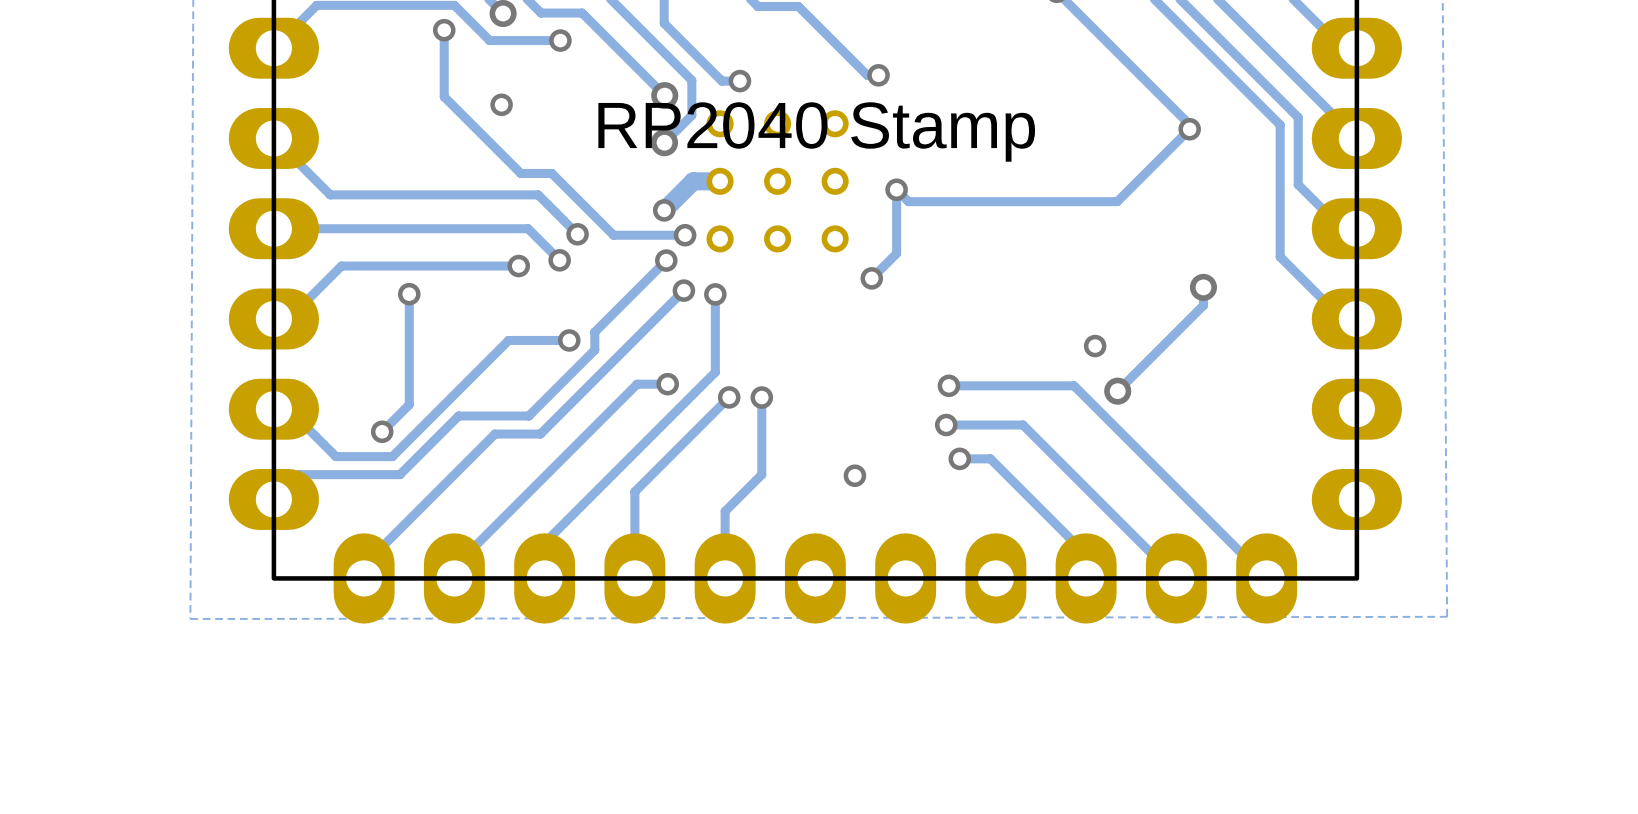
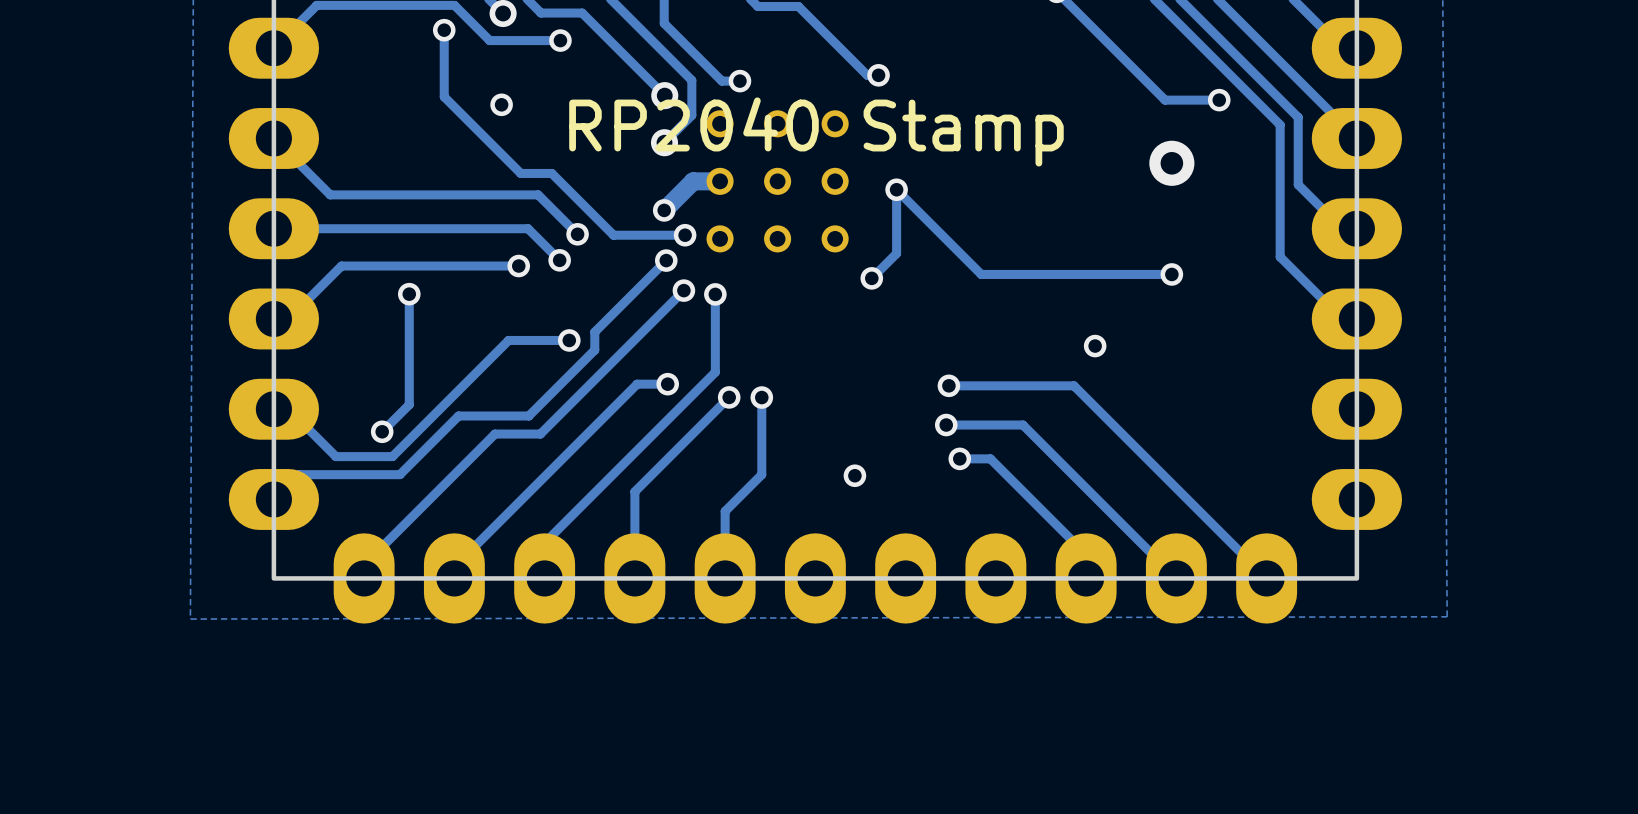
track: (1165, 100) (1189, 124) (1189, 129) (1117, 201) (908, 201) -> (1171, 274) (981, 274) (908, 201)
track: none -> (1219, 100) (1165, 100)
via position: (1189, 129) -> (1219, 100)
via: none -> (1171, 163)
via: none -> (1171, 274)
track: (1203, 287) (1203, 305) (1117, 391) -> none
via: (1203, 287) -> none
via: (1117, 391) -> none

